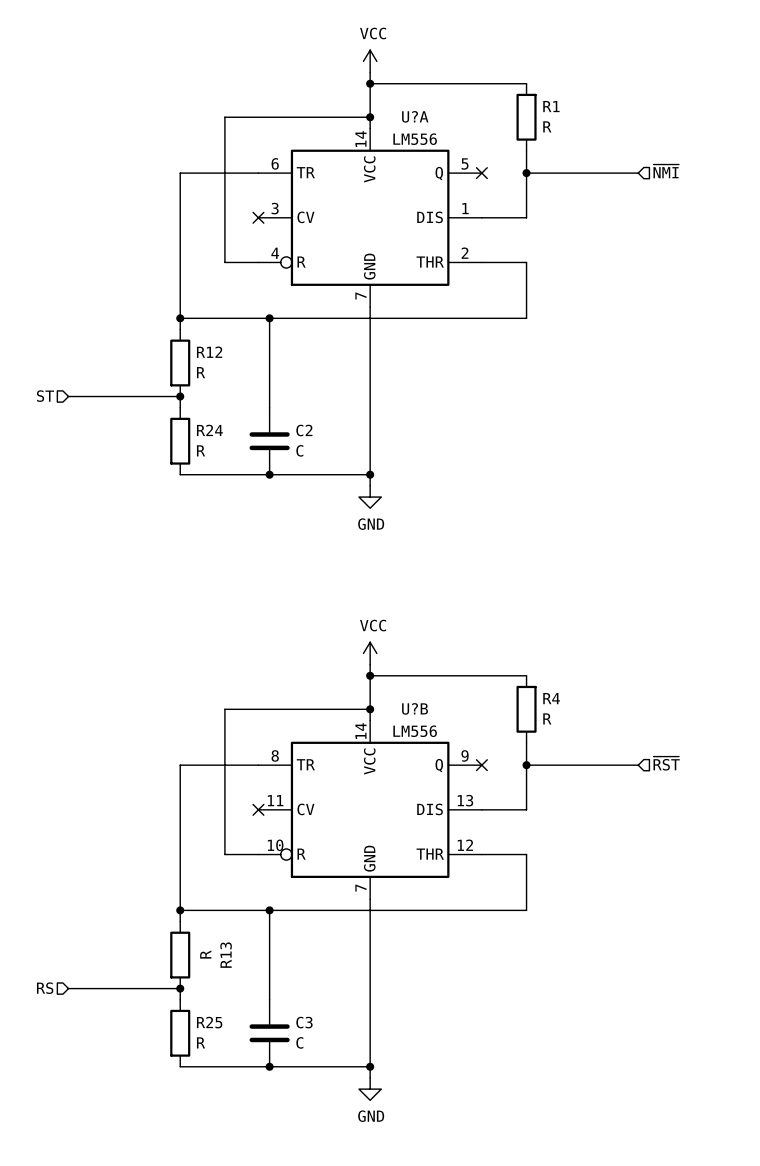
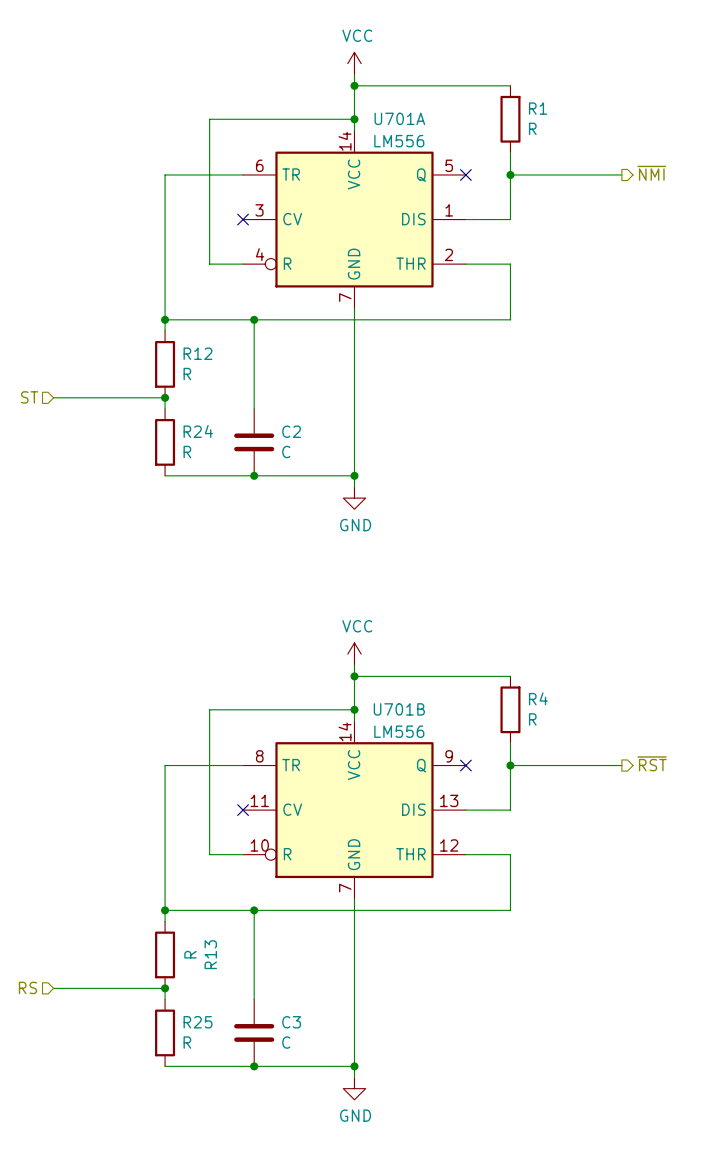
U?A name: U?A (415, 116) -> U701A (399, 118)
hierarchical label shape: input (666, 171) -> output (651, 173)
U?B name: U?B (415, 708) -> U701B (399, 709)
hierarchical label shape: input (666, 763) -> output (652, 763)

